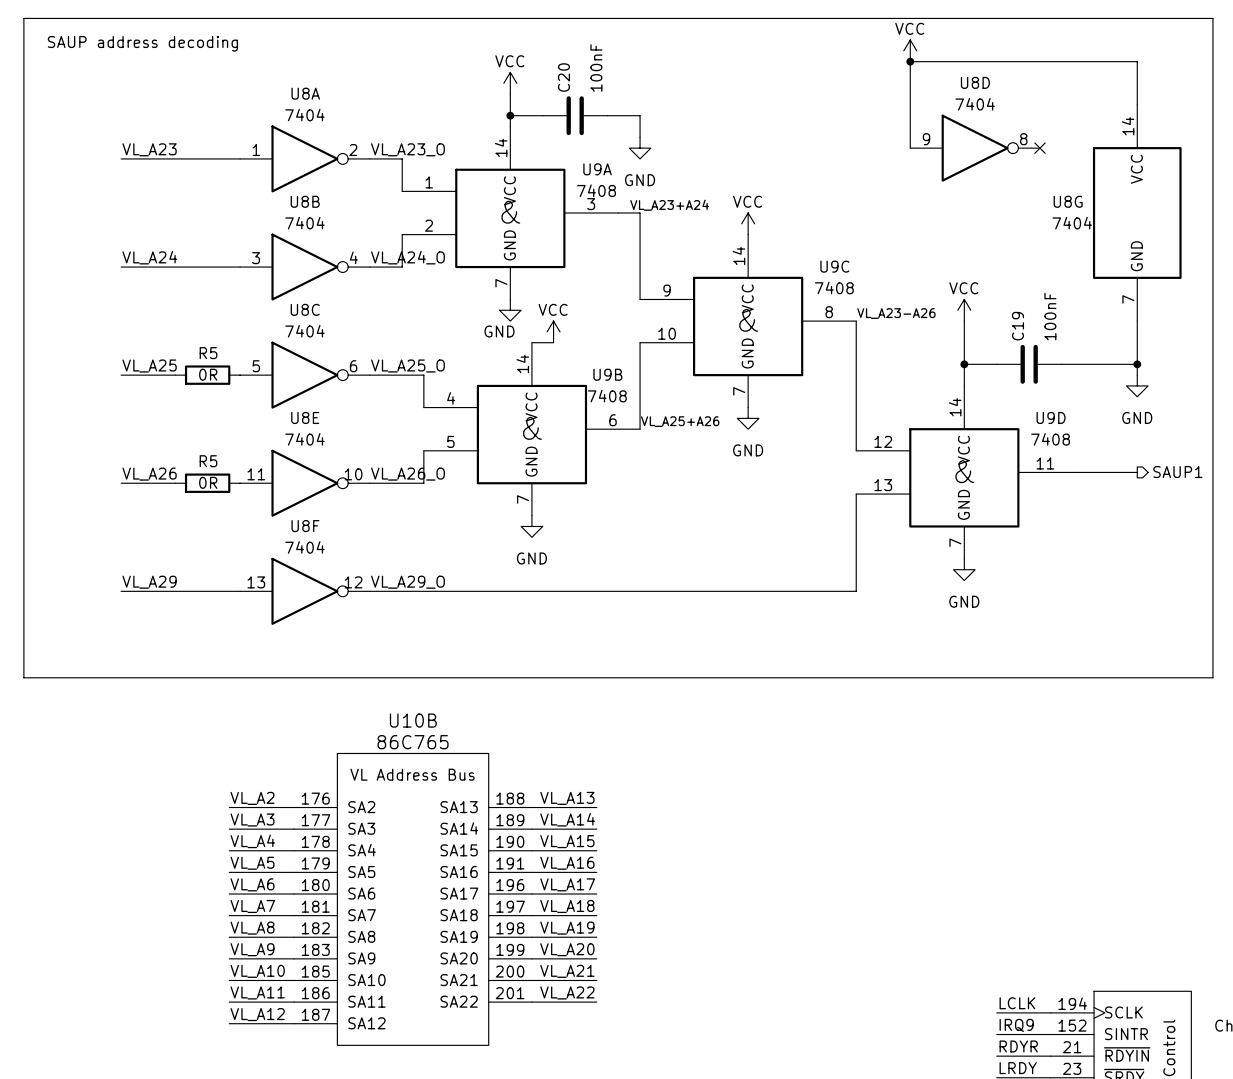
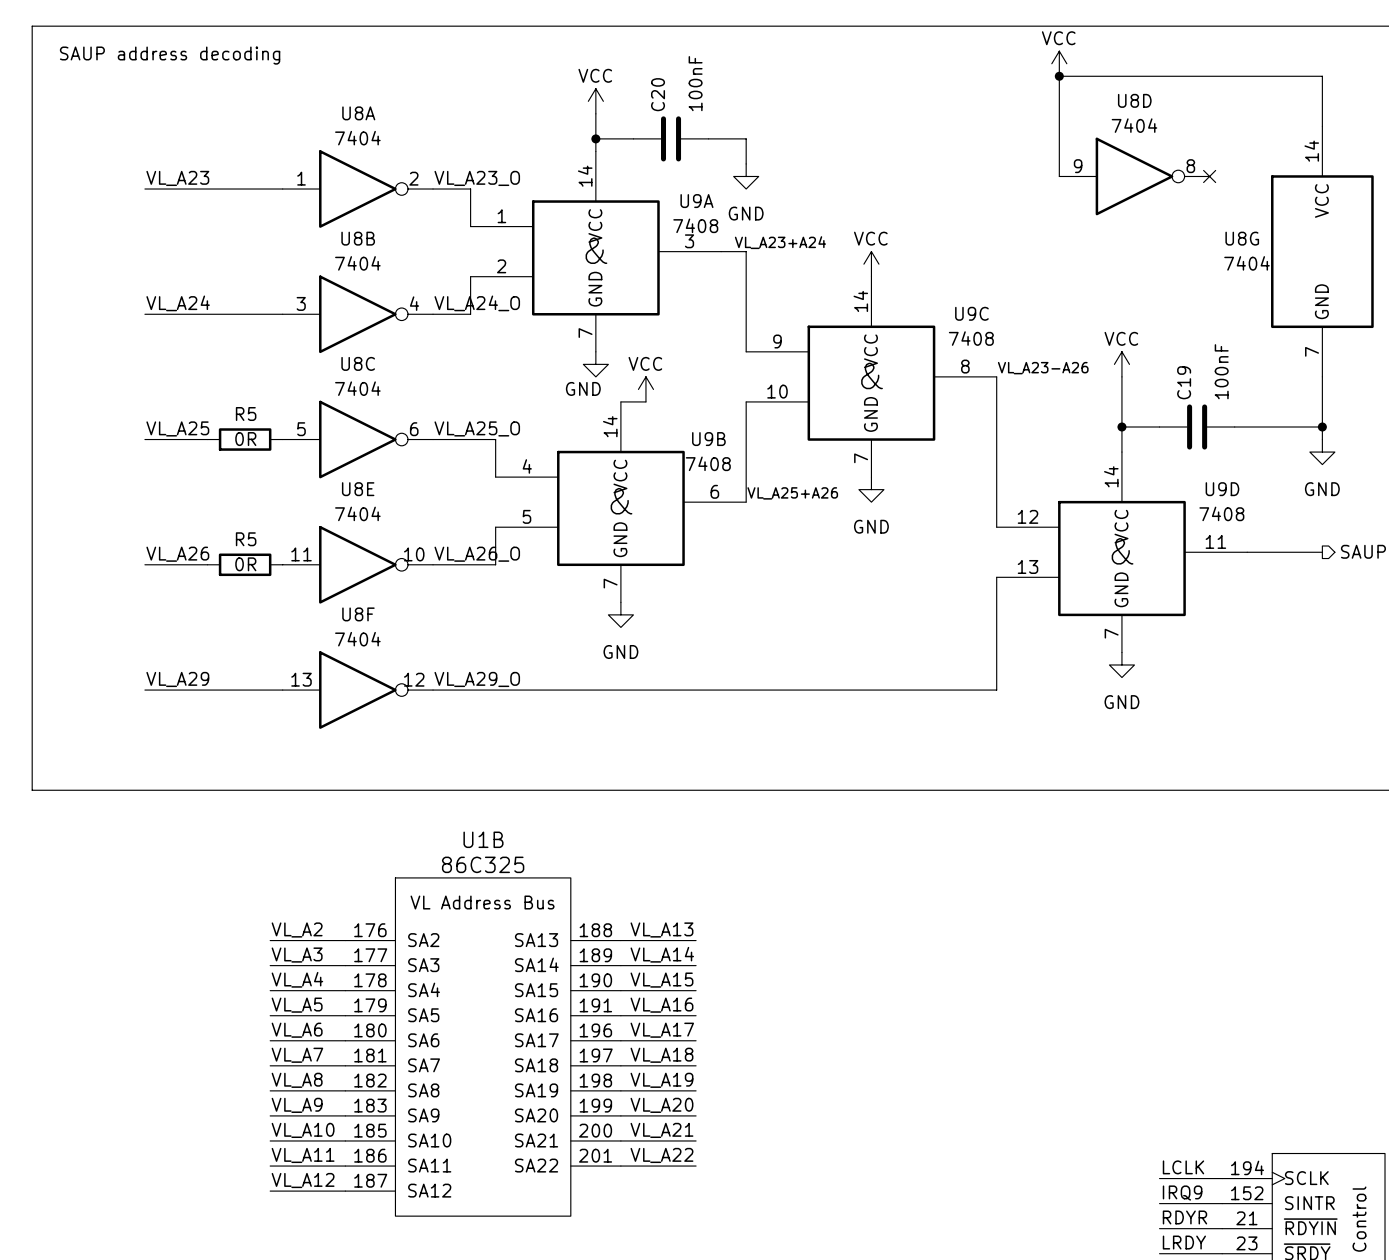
U10B name: U10B (413, 720) -> U1B (483, 839)
U10B value: 86C765 (413, 742) -> 86C325 (483, 864)

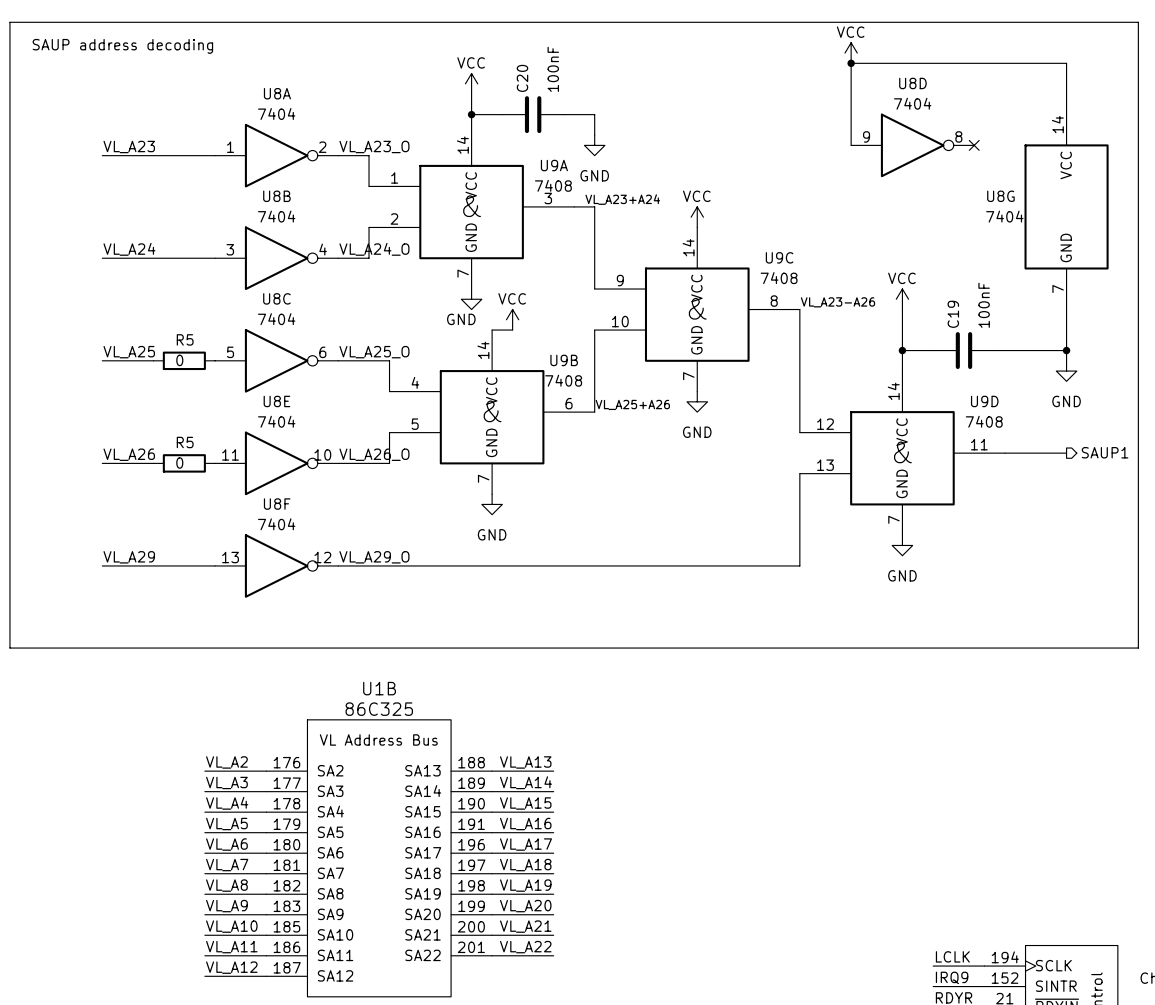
R5 value: 0R (245, 439) -> 0 (179, 360)
R5 value: 0R (245, 564) -> 0 (179, 463)

